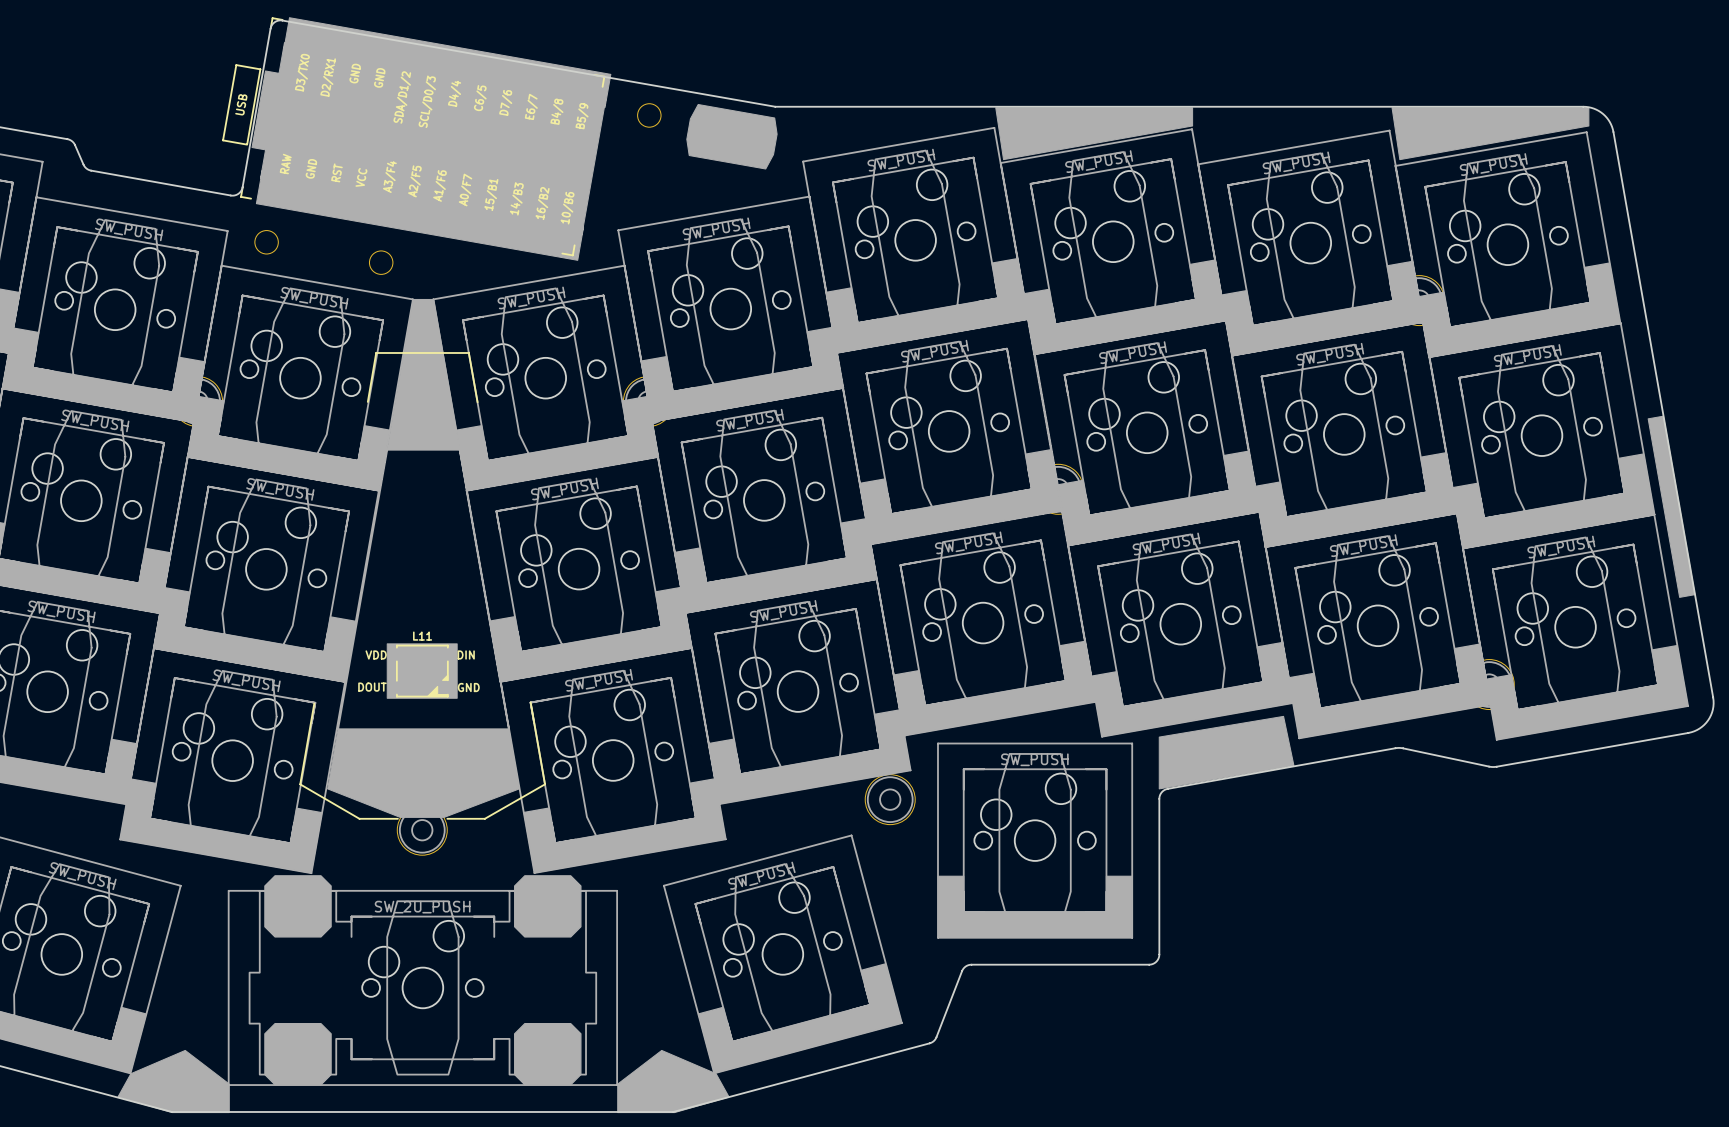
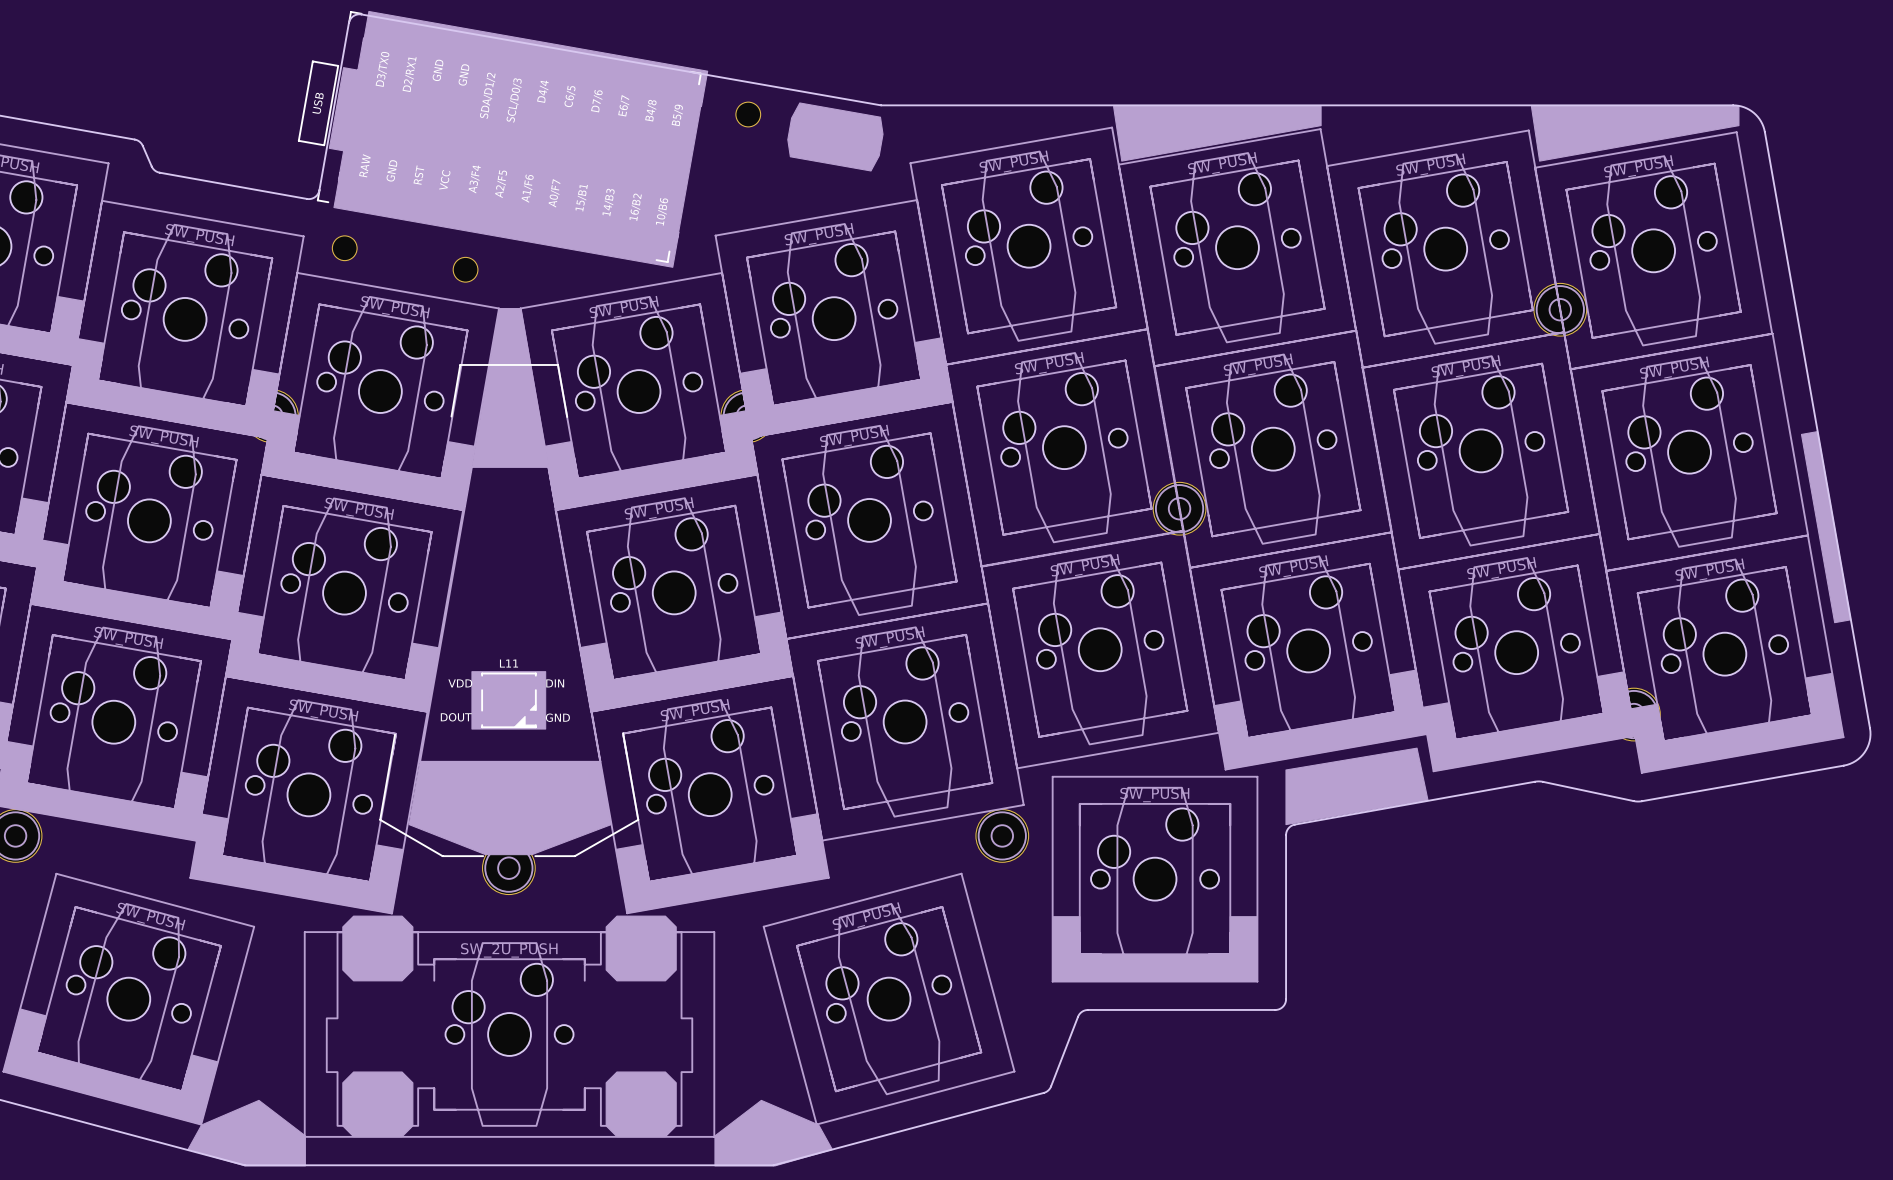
part footprint: [802, 127, 1029, 354] -> [909, 126, 1149, 366]
part footprint: [1000, 128, 1227, 356] -> [1118, 128, 1357, 368]
part footprint: [1197, 129, 1425, 357] -> [1326, 129, 1566, 369]
part footprint: [1394, 131, 1622, 358] -> [1534, 131, 1774, 371]
part footprint: [835, 318, 1063, 545] -> [945, 328, 1184, 568]
part footprint: [1033, 319, 1261, 547] -> [1153, 329, 1393, 569]
part footprint: [1231, 321, 1458, 548] -> [1361, 331, 1601, 571]
part footprint: [1428, 322, 1656, 549] -> [1570, 332, 1809, 572]
part footprint: [651, 387, 878, 614] -> [750, 401, 989, 640]
part footprint: [869, 509, 1097, 737] -> [980, 530, 1220, 770]
part footprint: [684, 578, 912, 805] -> [785, 602, 1025, 842]
part footprint: [663, 834, 903, 1075] -> [762, 872, 1016, 1126]

